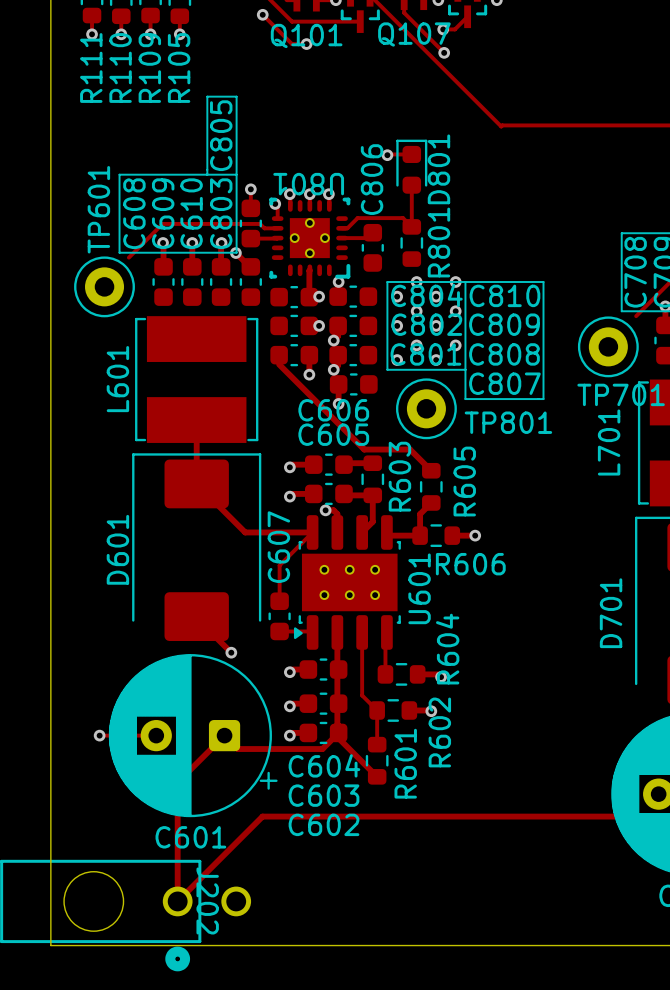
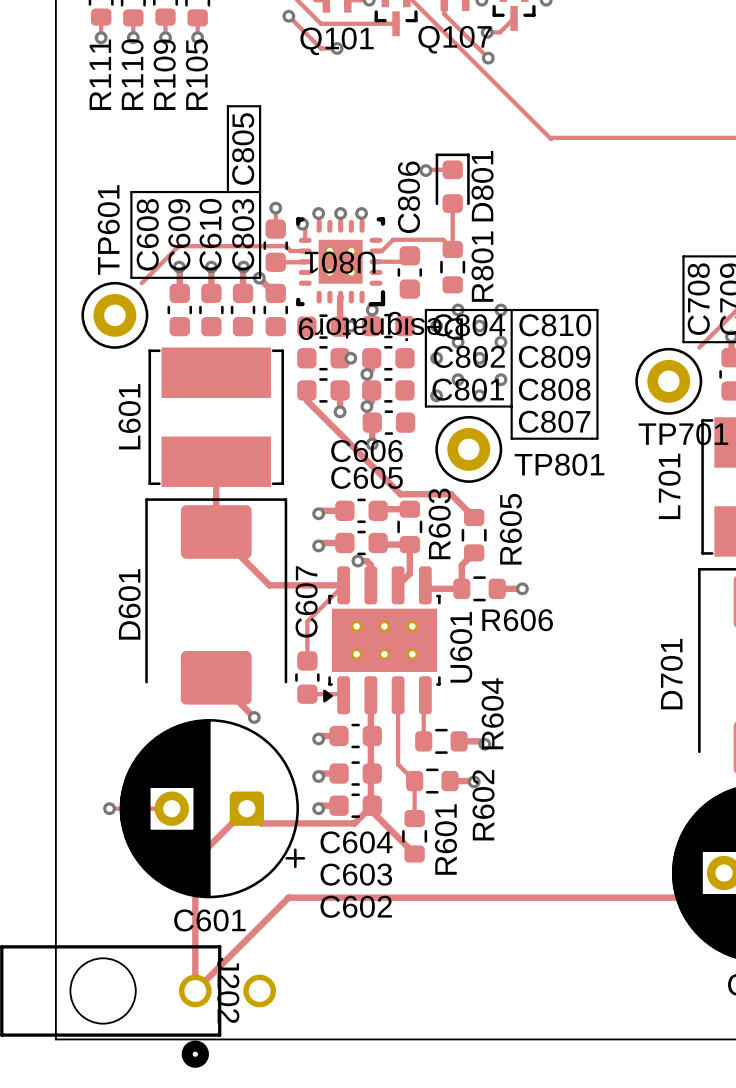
U801 name position: U801 (308, 184) -> U801 (340, 262)
U801 footprint: [269, 197, 351, 279] -> [296, 217, 386, 307]

